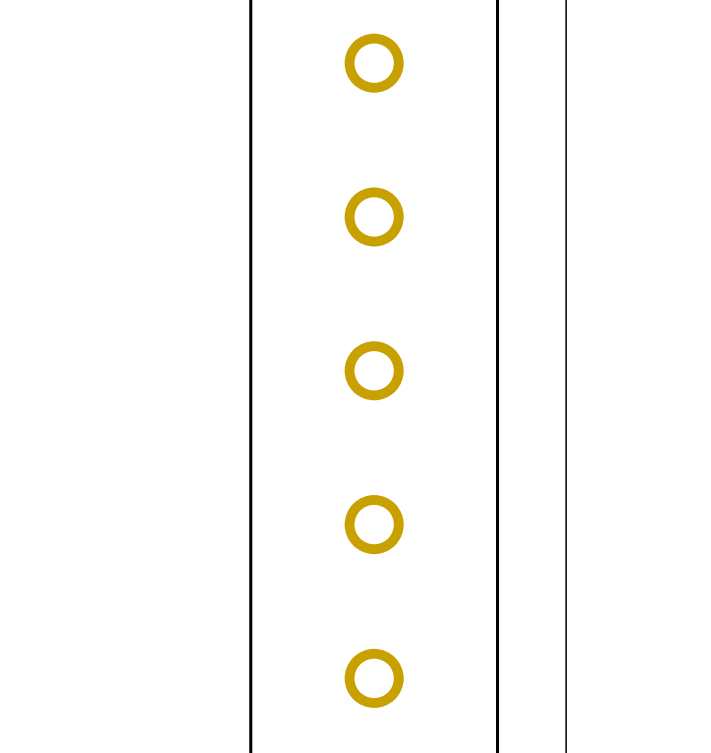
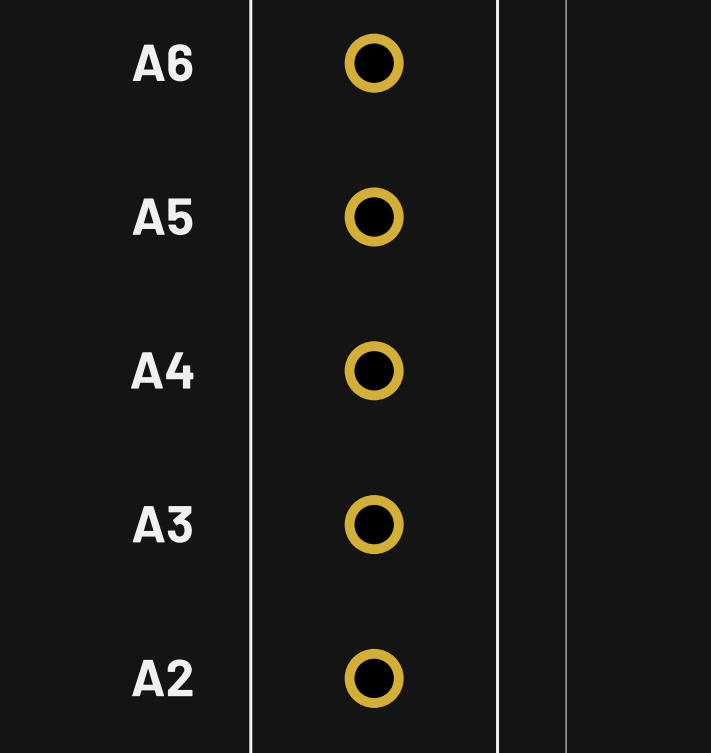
text: none -> A6 (162, 62)
text: none -> A5 (162, 216)
text: none -> A4 (162, 370)
text: none -> A3 (162, 524)
text: none -> A2 (162, 677)

